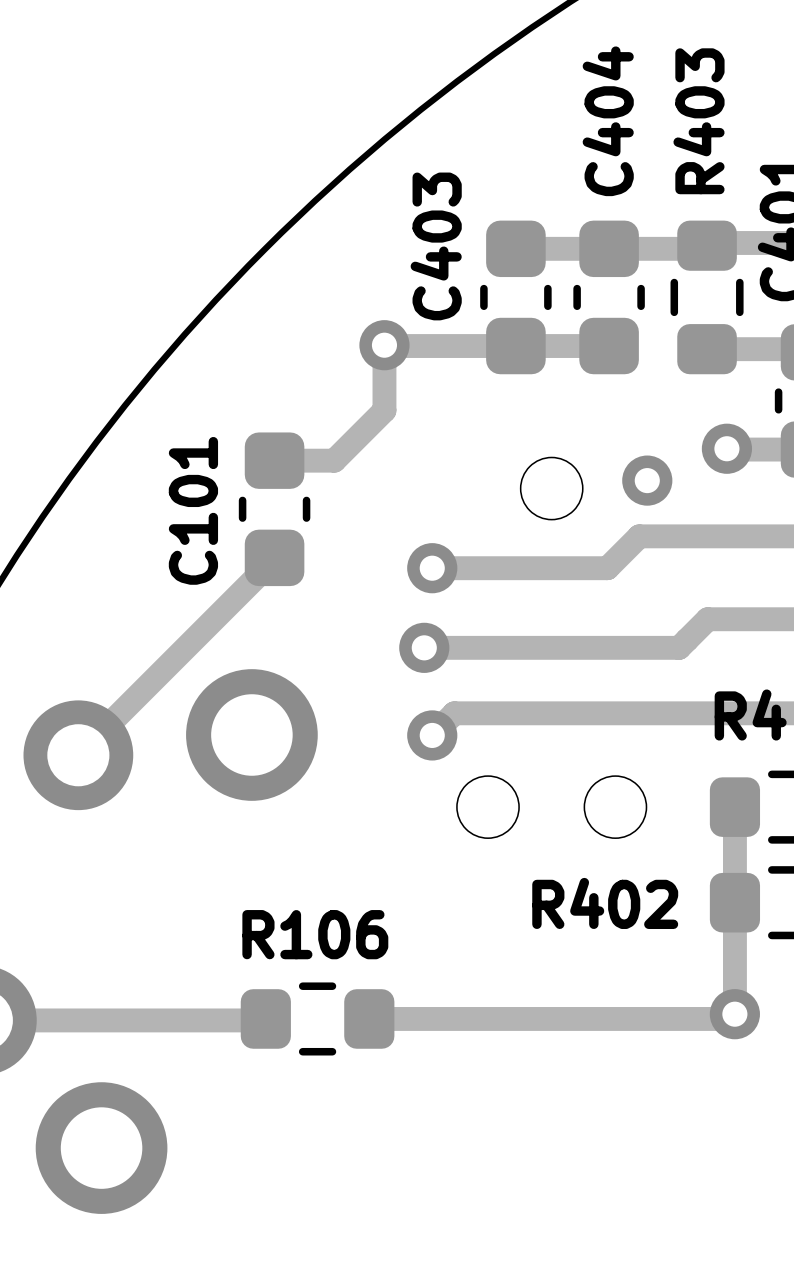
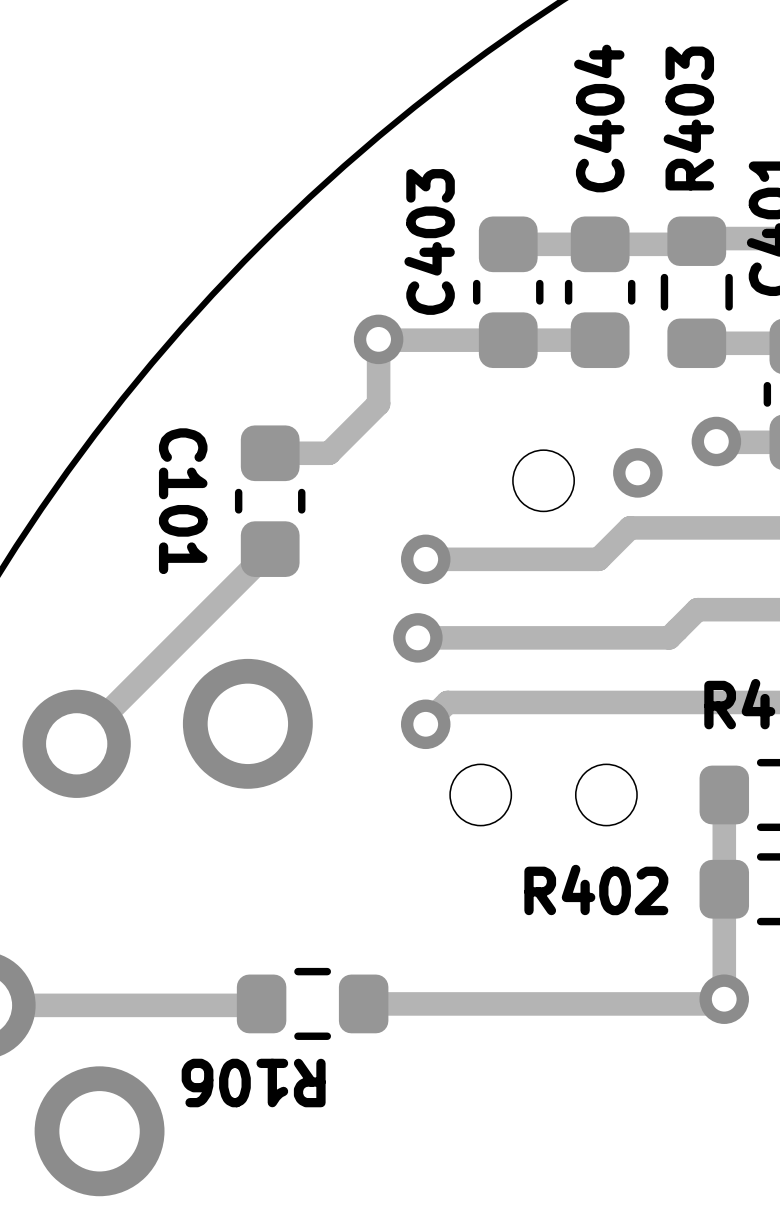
C101 name rotation: 0° (193, 510) -> 180° (183, 501)
R106 name rotation: 0° (315, 934) -> 180° (253, 1083)

